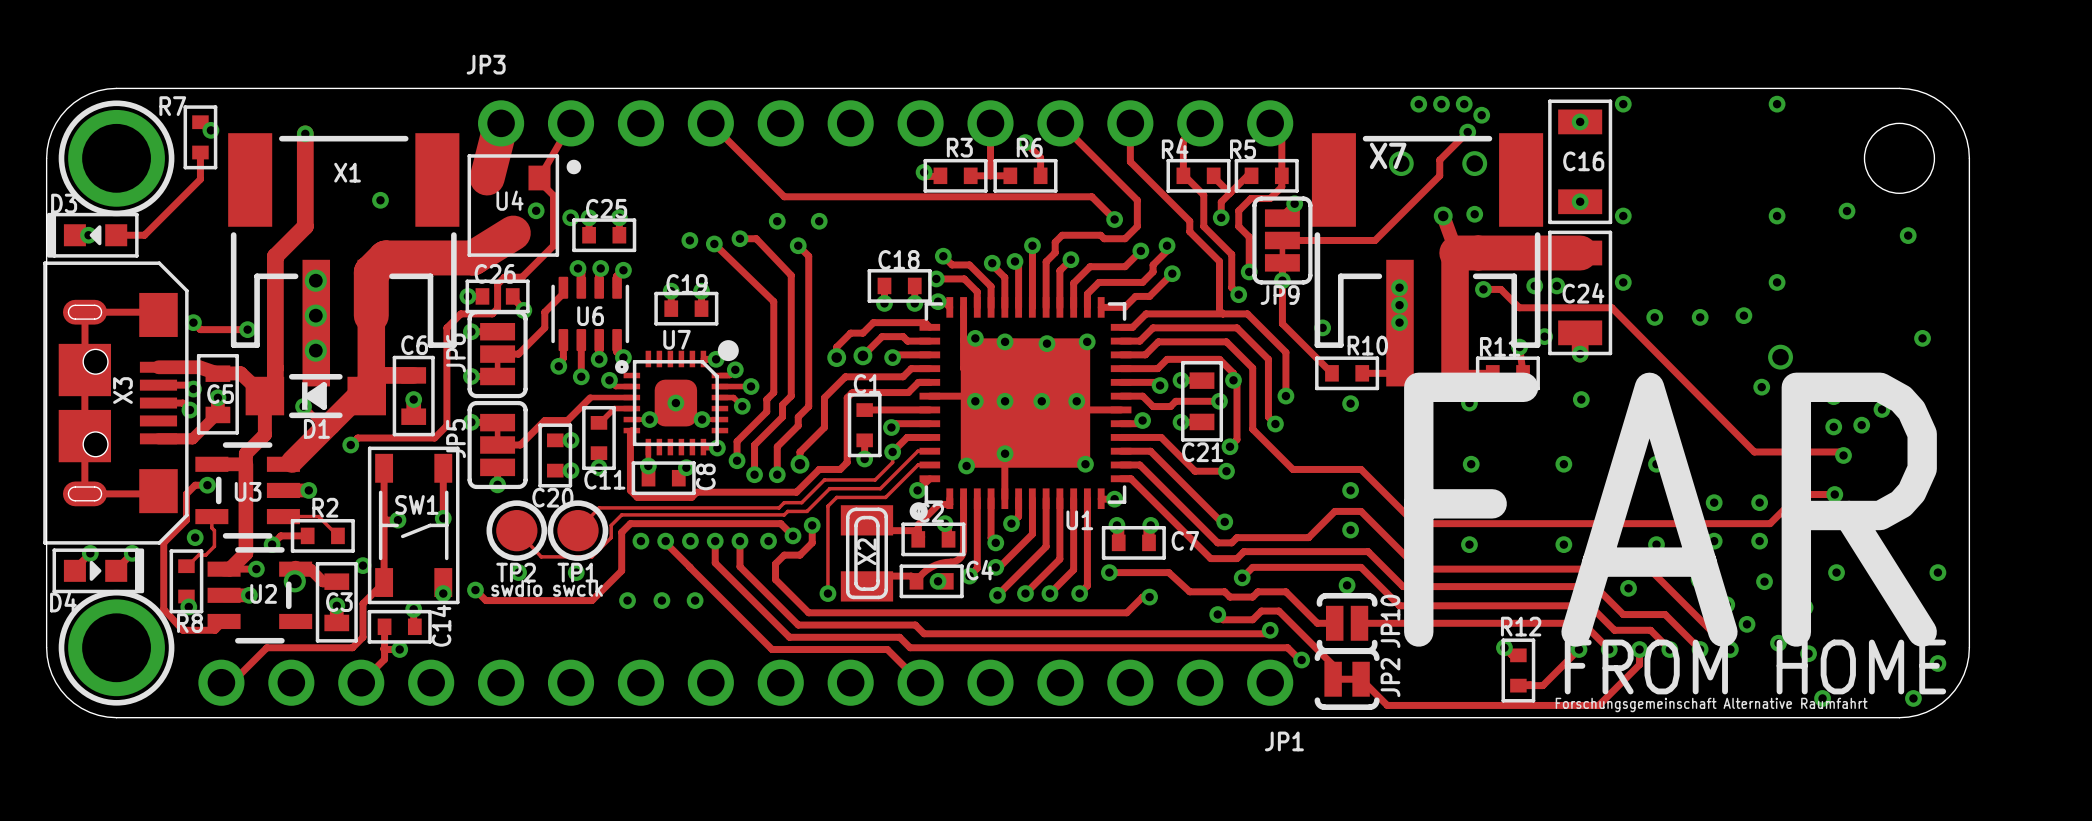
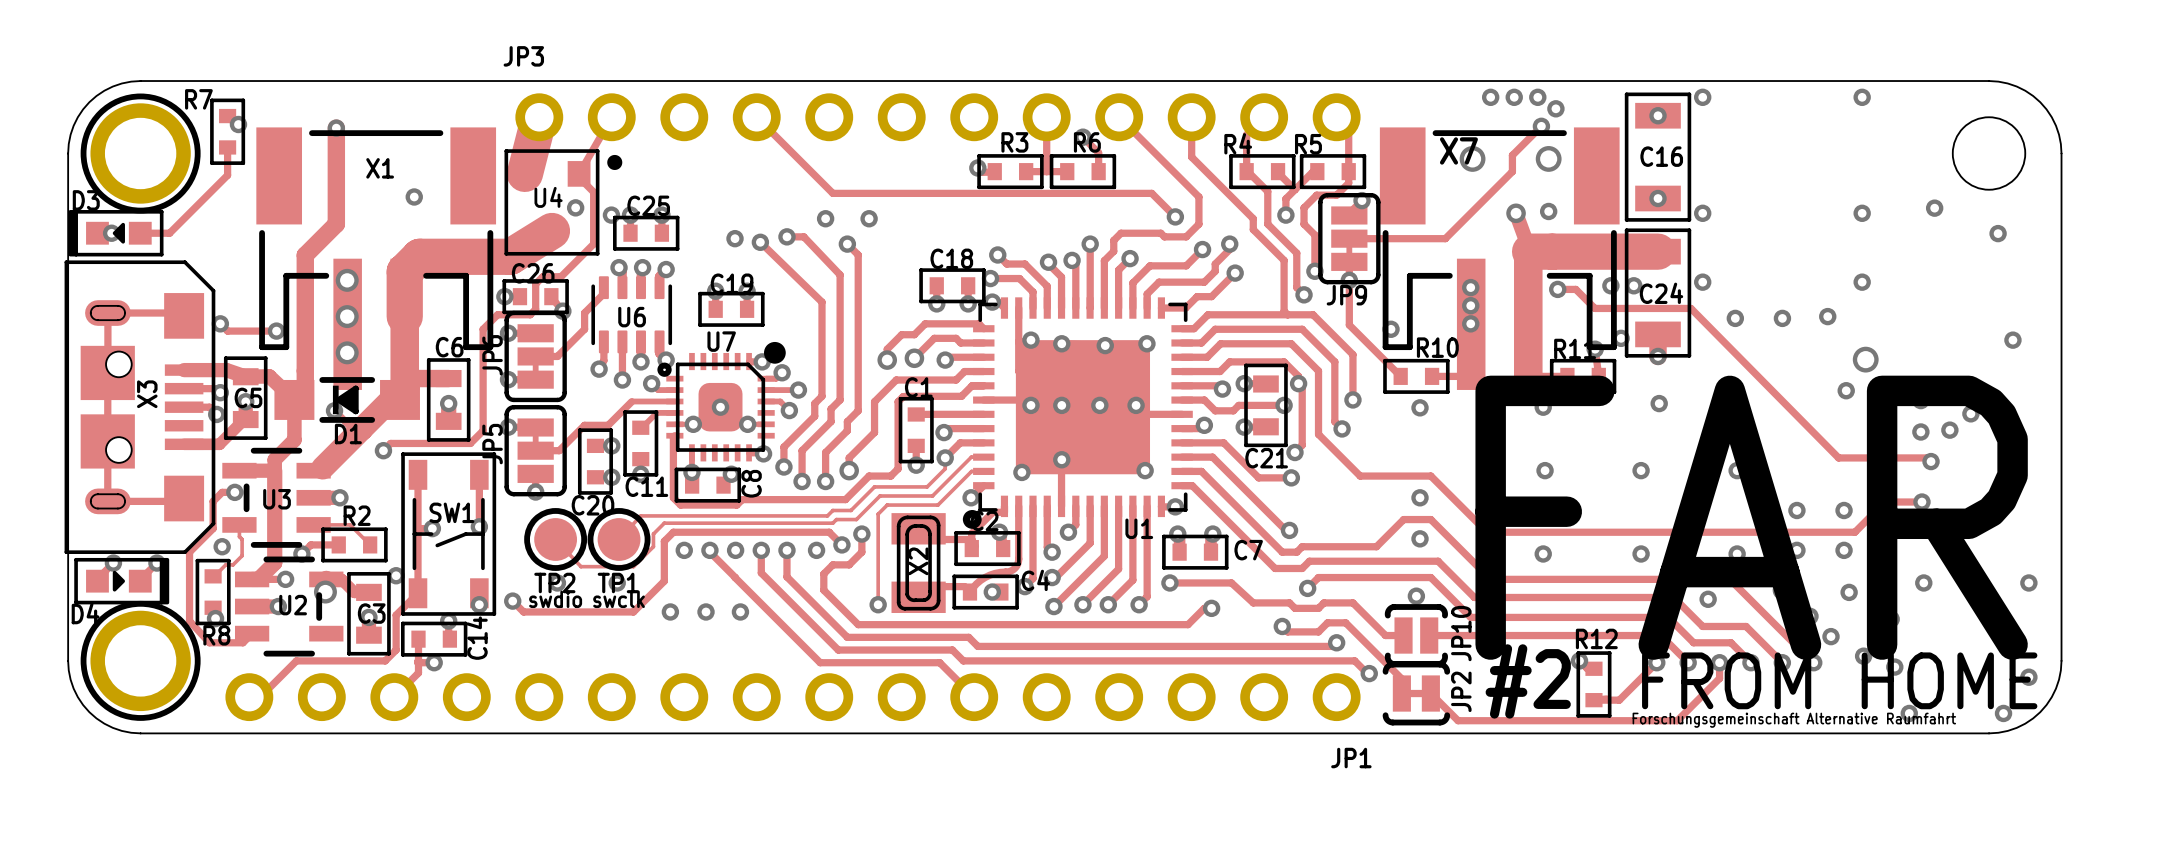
text: none -> #2 (1528, 681)

